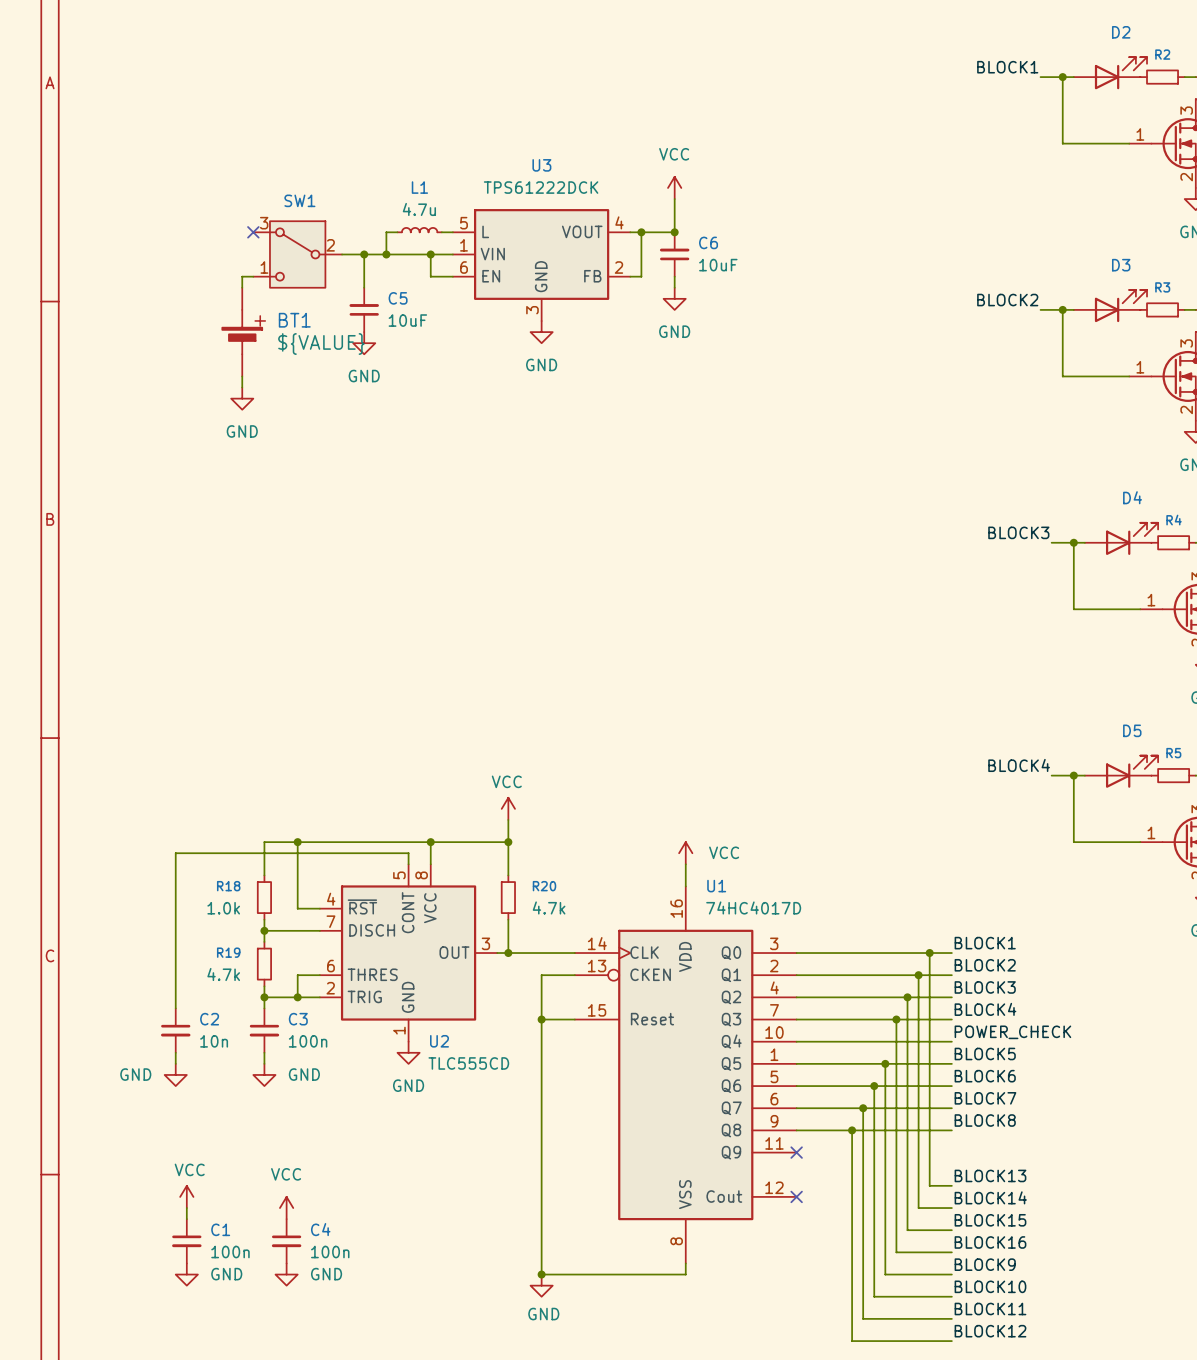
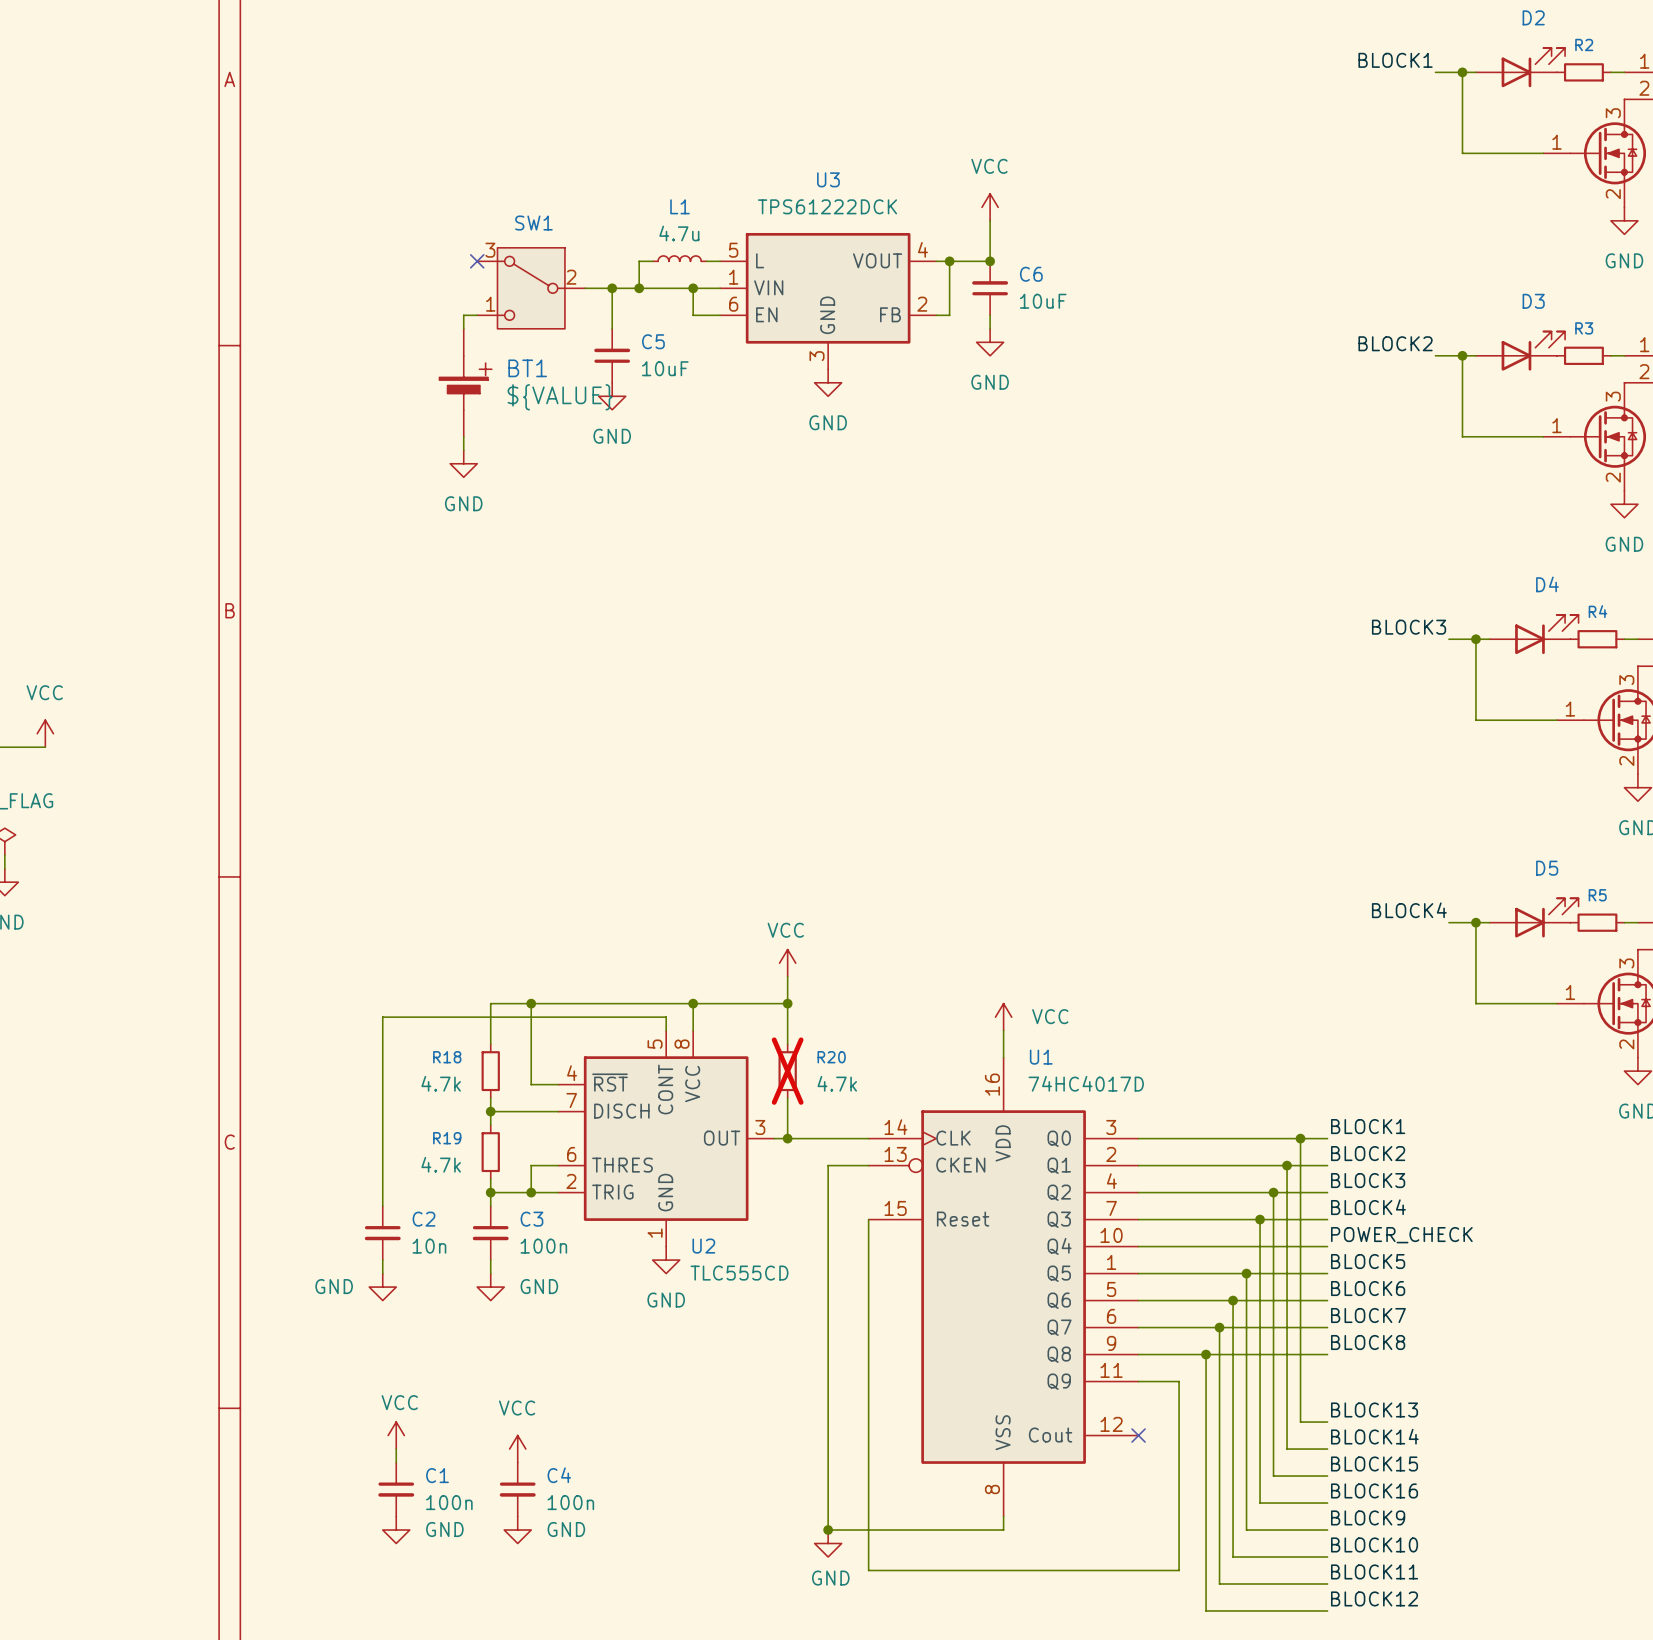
R20 do-not-place cross: none -> (787, 1071)
R18 value: 1.0k (223, 908) -> 4.7k (441, 1083)
wire: (541, 1019) (574, 1019) -> (1138, 1381) (1179, 1381) (1179, 1570) (868, 1570) (868, 1219)
junction: (541, 1019) -> none
no-connect mark: (796, 1152) -> none

